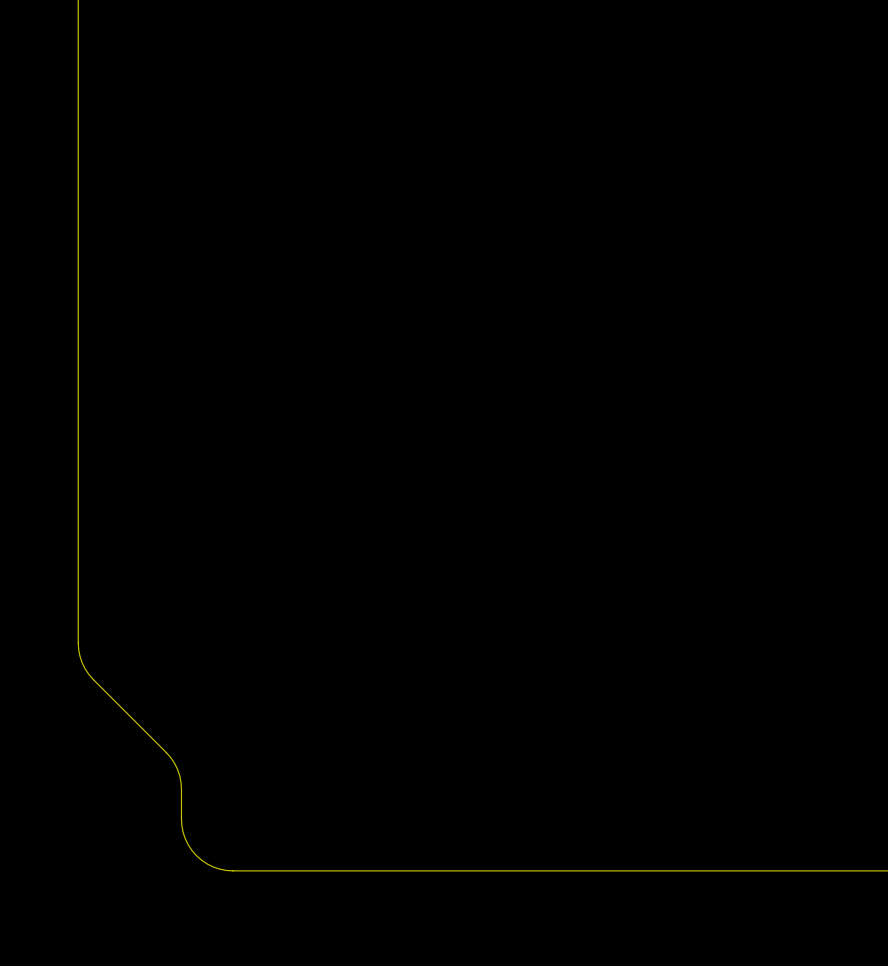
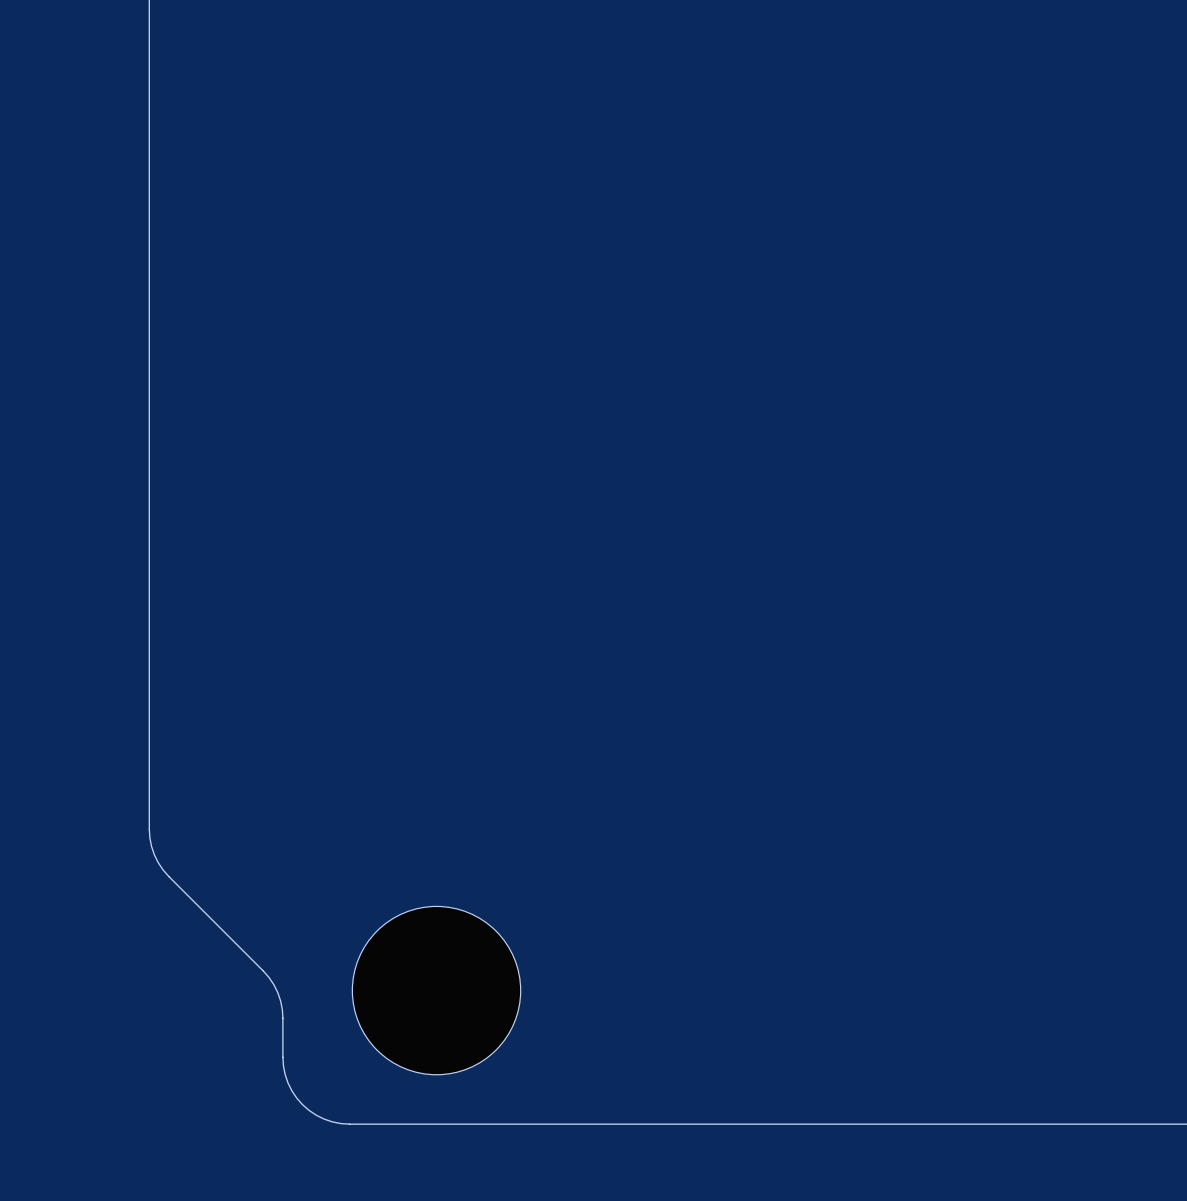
hole: none -> (436, 990)

